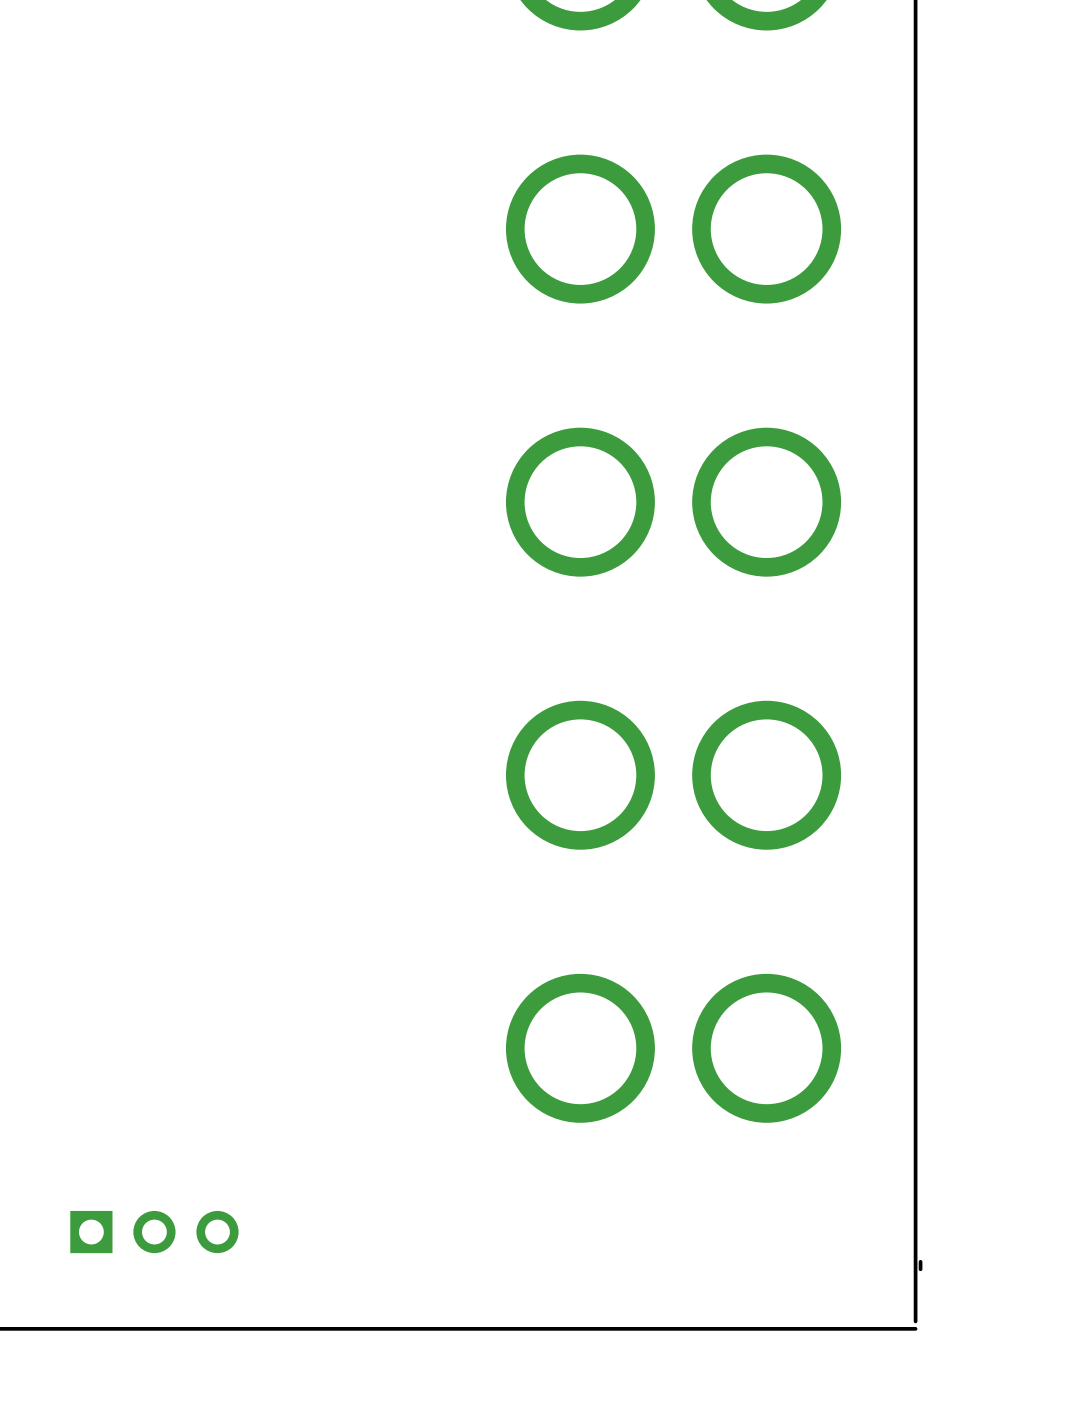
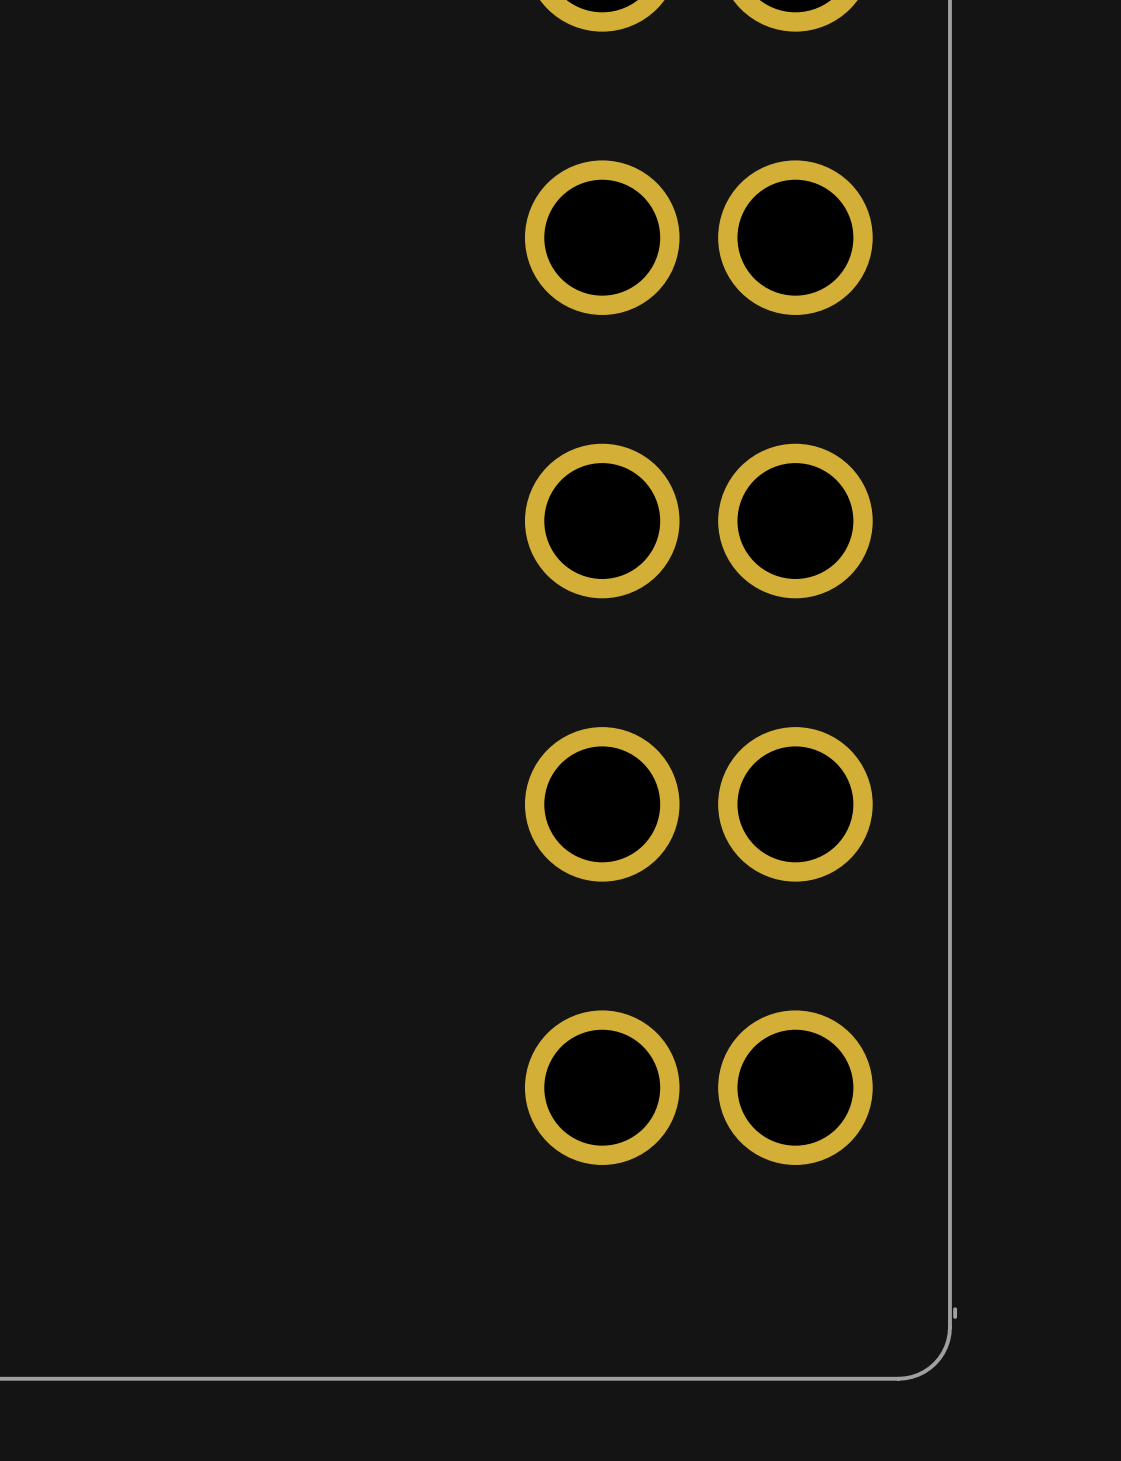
part: (154, 1232) -> none
board edge: (915, 1279) (915, 1321) -> none
board edge: (915, 1328) (865, 1328) -> (949, 1327) (946, 1346) (934, 1363) (918, 1374) (898, 1378)

